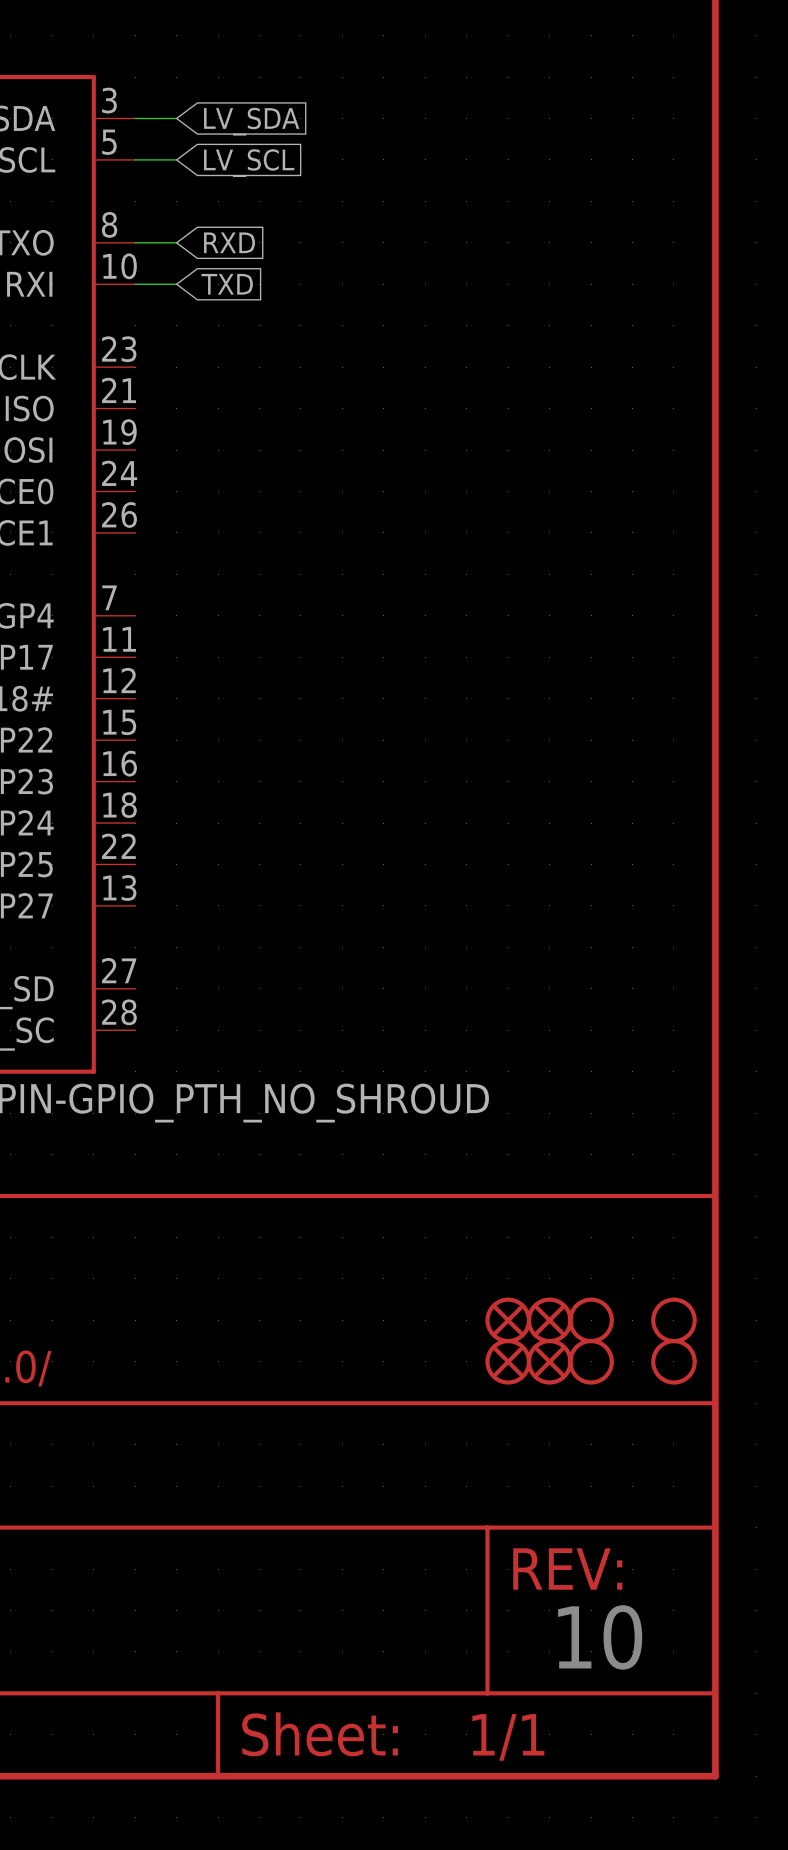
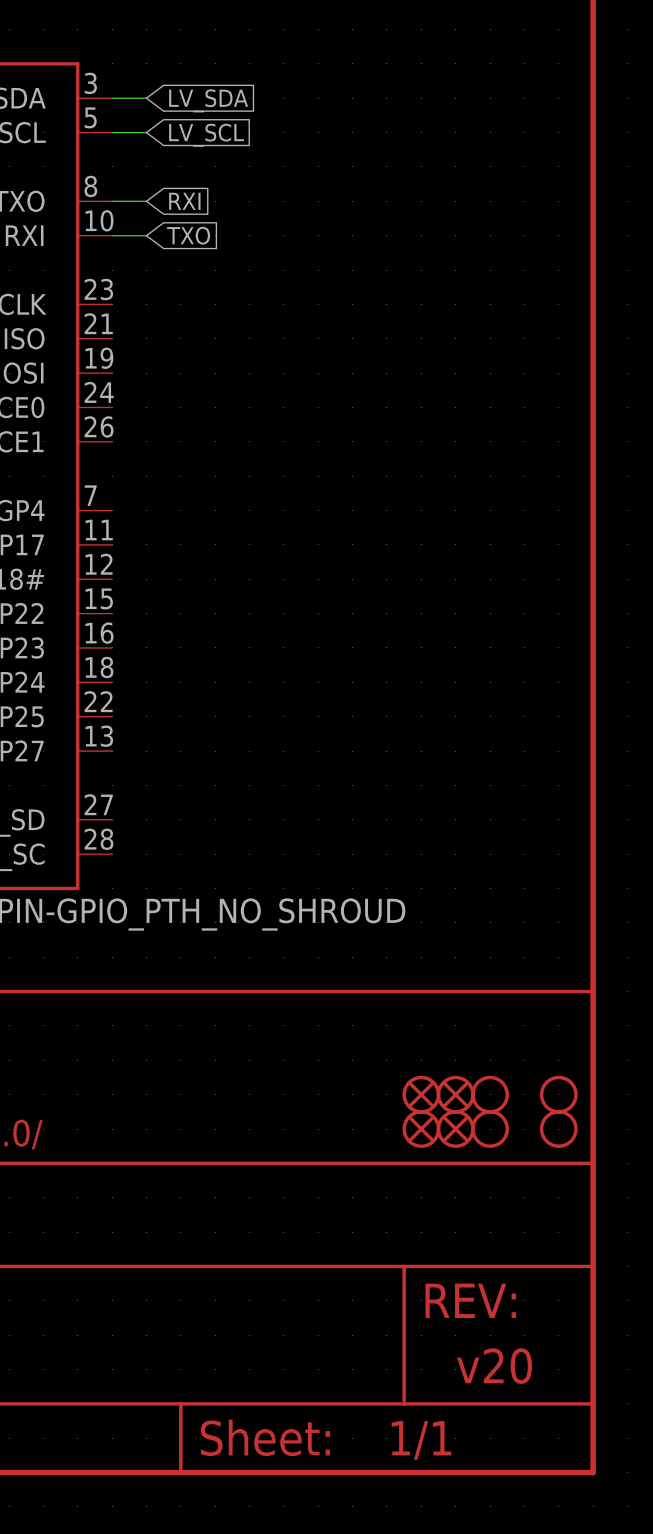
global label: RXD (229, 242) -> RXI (184, 201)
global label: TXD (227, 284) -> TXO (188, 235)
text: 10 (600, 1637) -> v20 (494, 1366)

